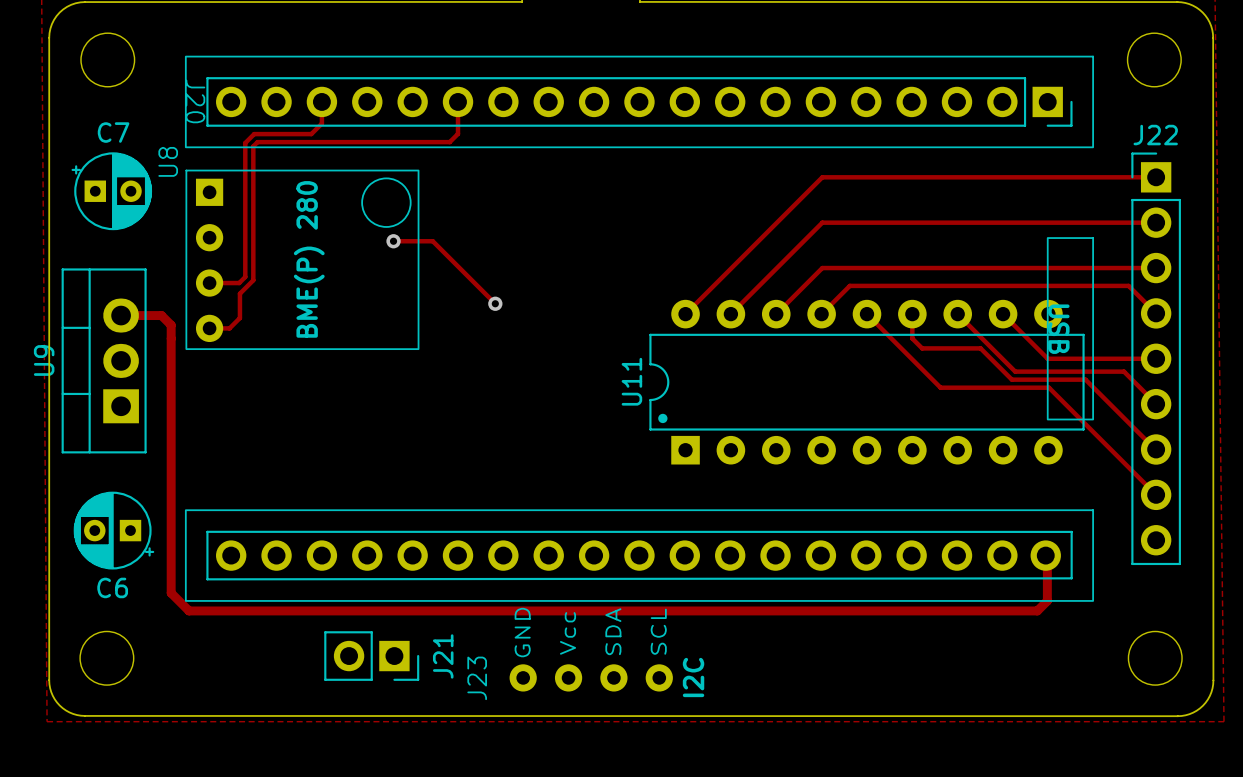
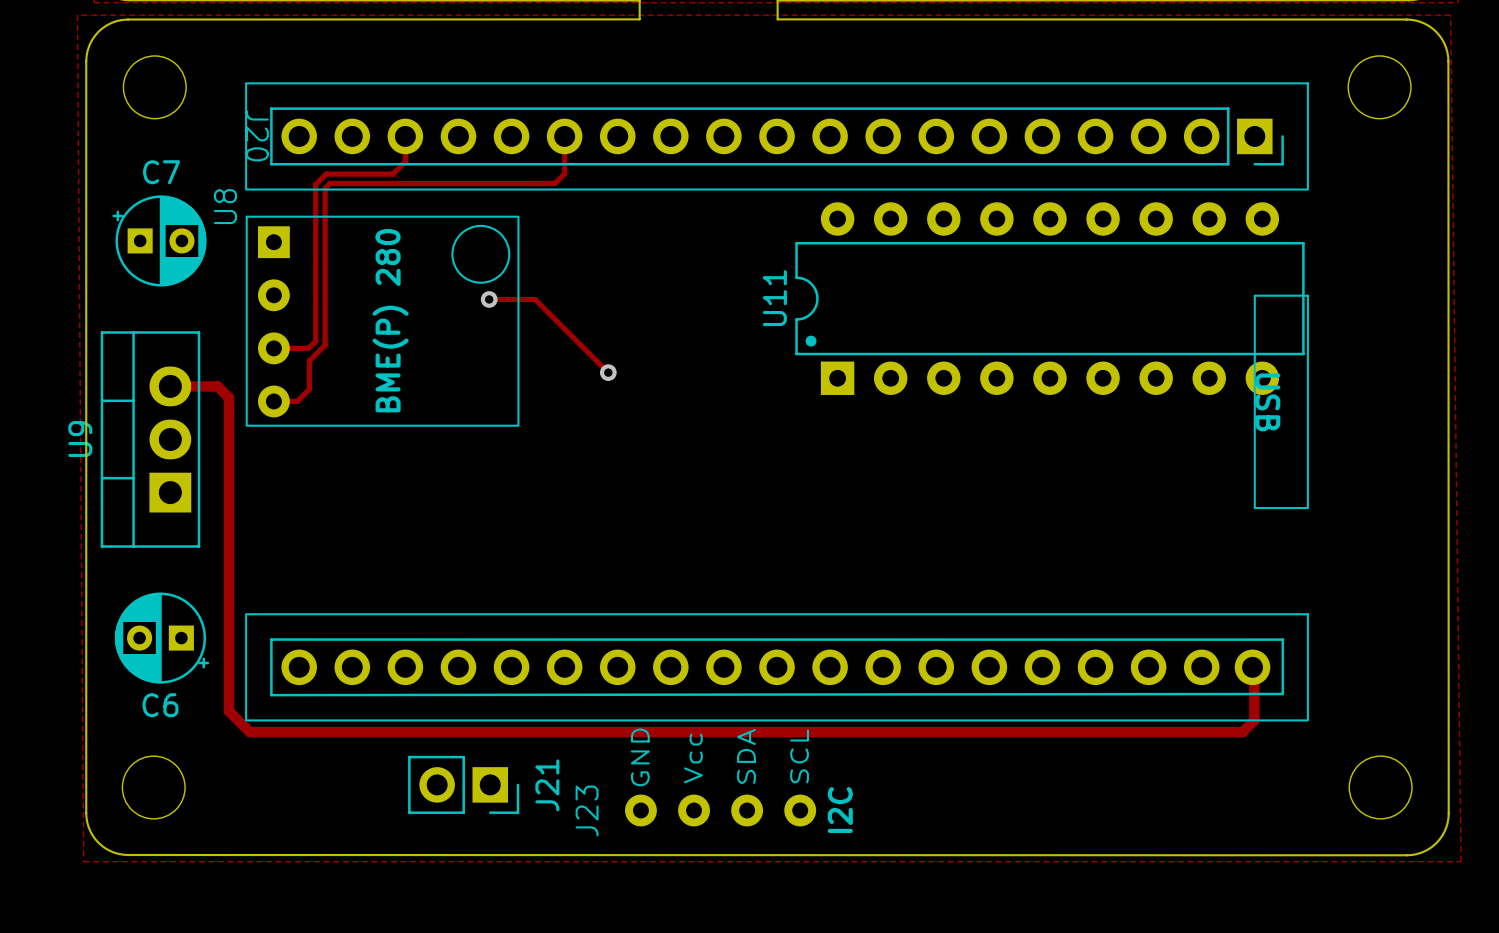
track: (1156, 177) (822, 177) (685, 314) -> none
track: (1156, 222) (822, 222) (730, 314) -> none
track: (1156, 268) (822, 268) (776, 314) -> none
track: (1156, 313) (1128, 285) (849, 285) (821, 314) -> none
track: (866, 314) (940, 387) (1048, 387) (1156, 494) -> none
track: (912, 314) (912, 338) (922, 348) (980, 348) (1011, 379) (1085, 379) (1156, 449) -> none
track: (957, 314) (1015, 371) (1123, 371) (1156, 403) -> none
track: (1003, 314) (1047, 358) (1156, 358) -> none
J22: (1156, 358) -> none
U11 position: (866, 382) -> (1049, 298)

